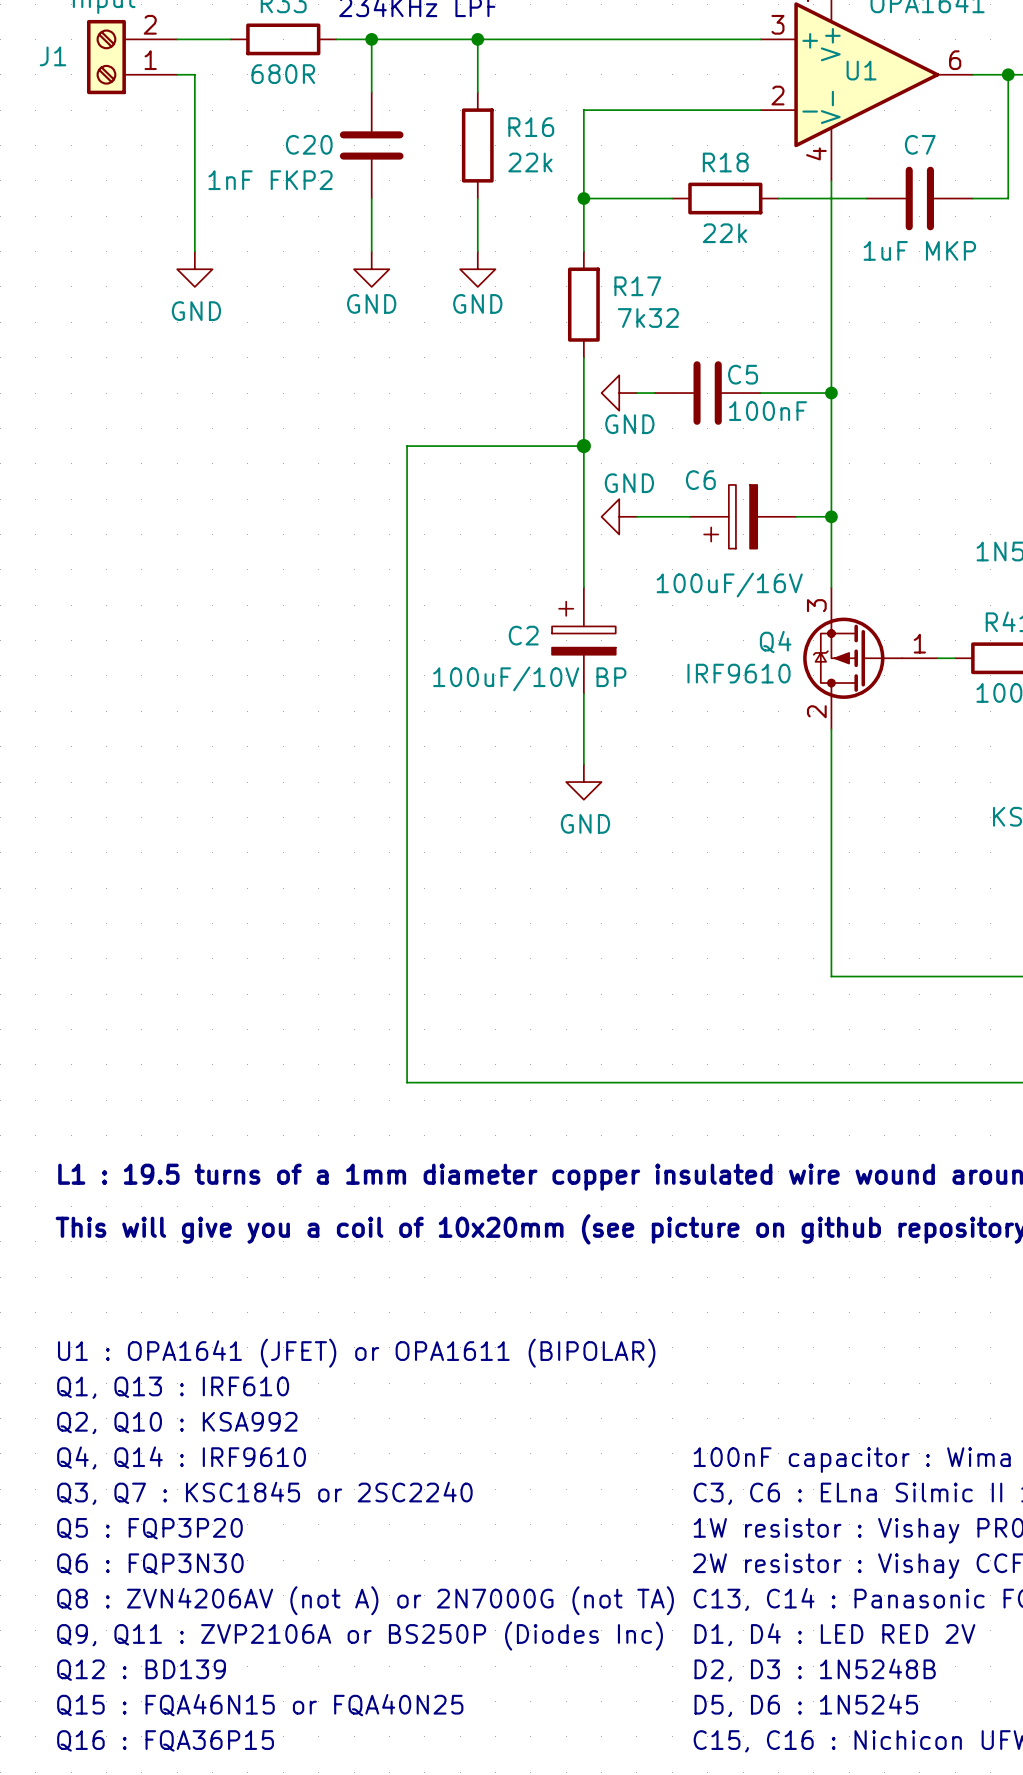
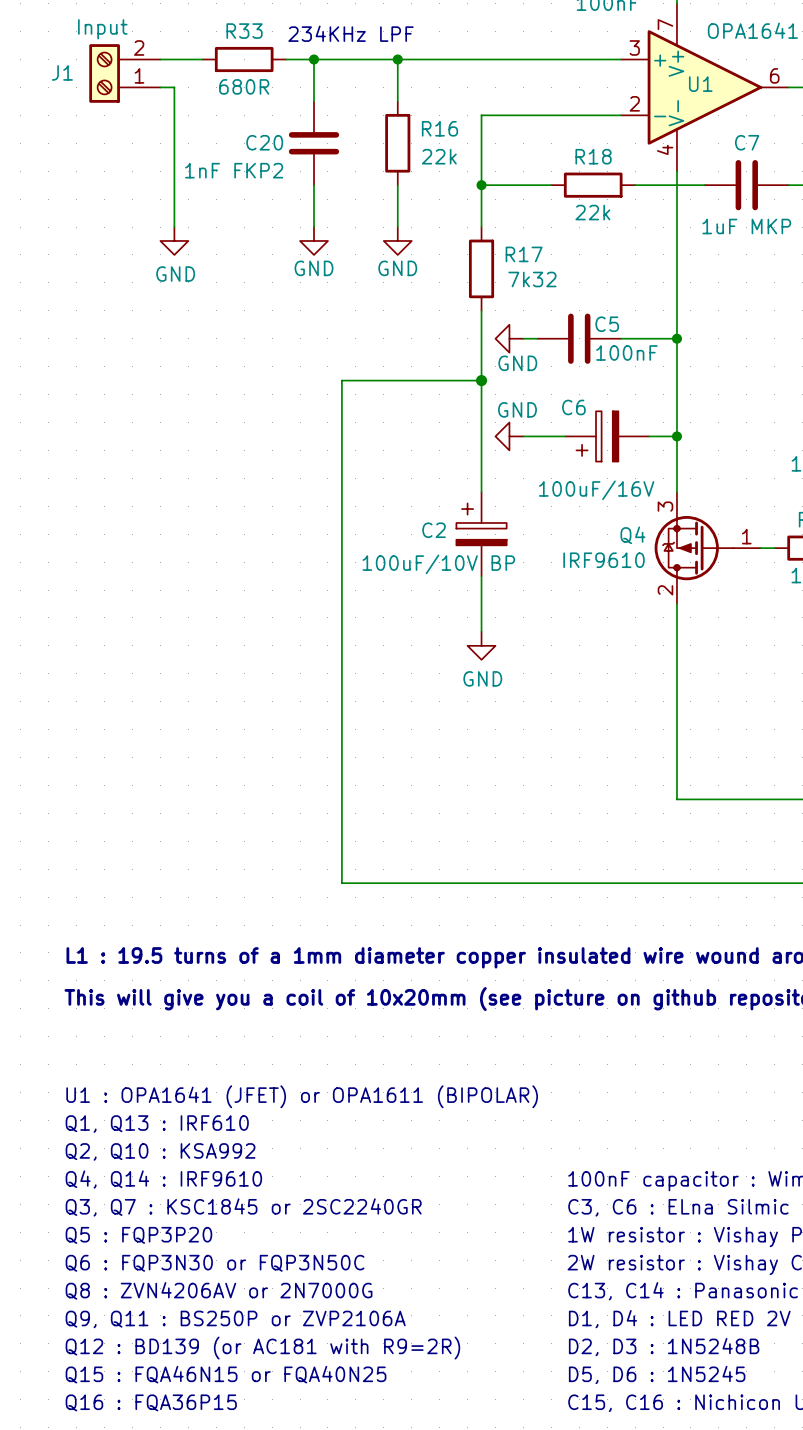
text: Q3, Q7 : KSC1845 or 2SC2240 (264, 1493) -> Q3, Q7 : KSC1845 or 2SC2240GR (243, 1207)
text: Q6 : FQP3N30 (150, 1564) -> Q6 : FQP3N30 or FQP3N50C (215, 1263)
text: Q8 : ZVN4206AV (not A) or 2N7000G (not TA) (365, 1600) -> Q8 : ZVN4206AV or 2N7000G (219, 1290)
text: Q9, Q11 : ZVP2106A or BS250P (Diodes Inc) (360, 1636) -> Q9, Q11 : BS250P or ZVP2106A (235, 1319)
text: Q12 : BD139 (141, 1670) -> Q12 : BD139 (or AC181 with R9=2R) (262, 1348)

